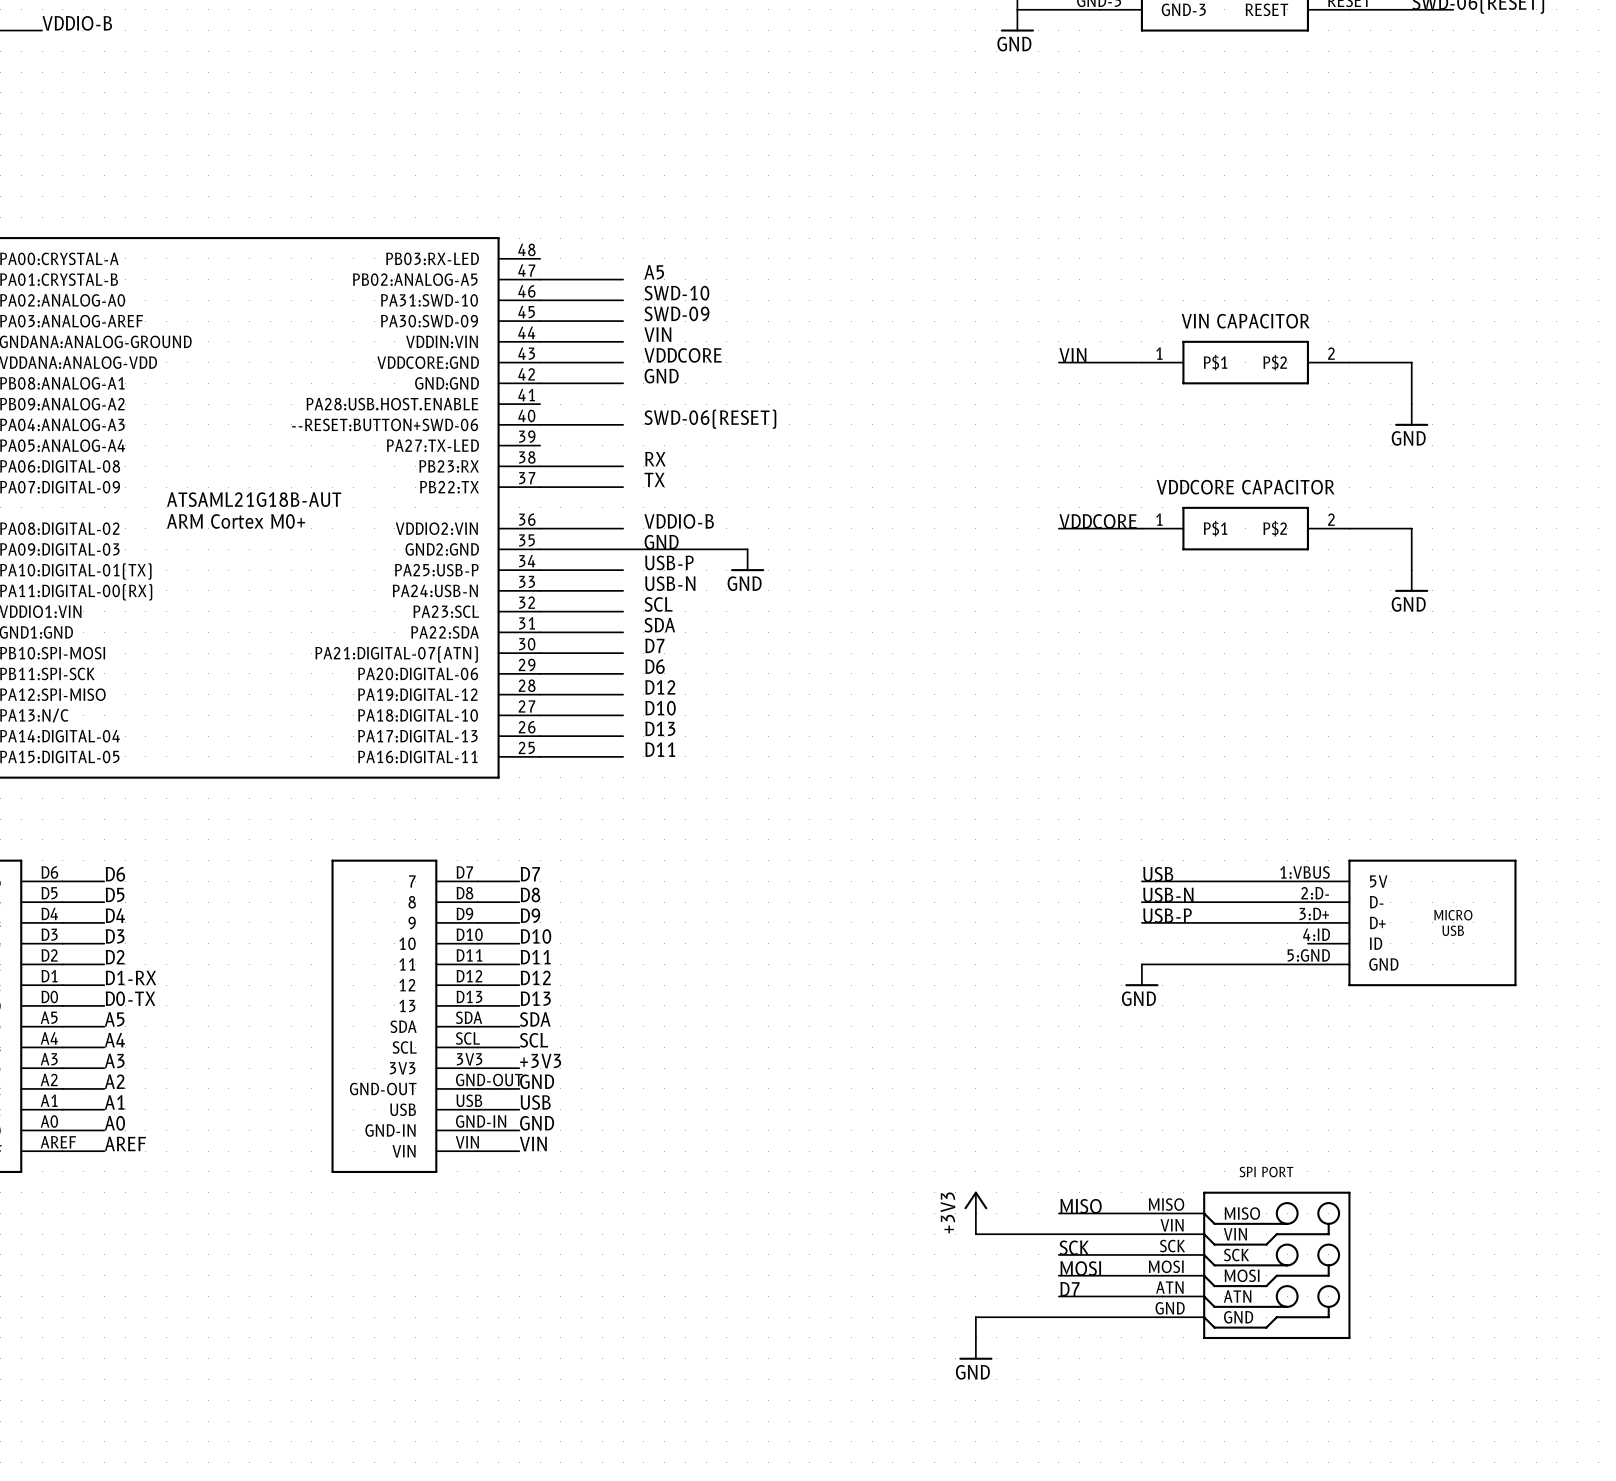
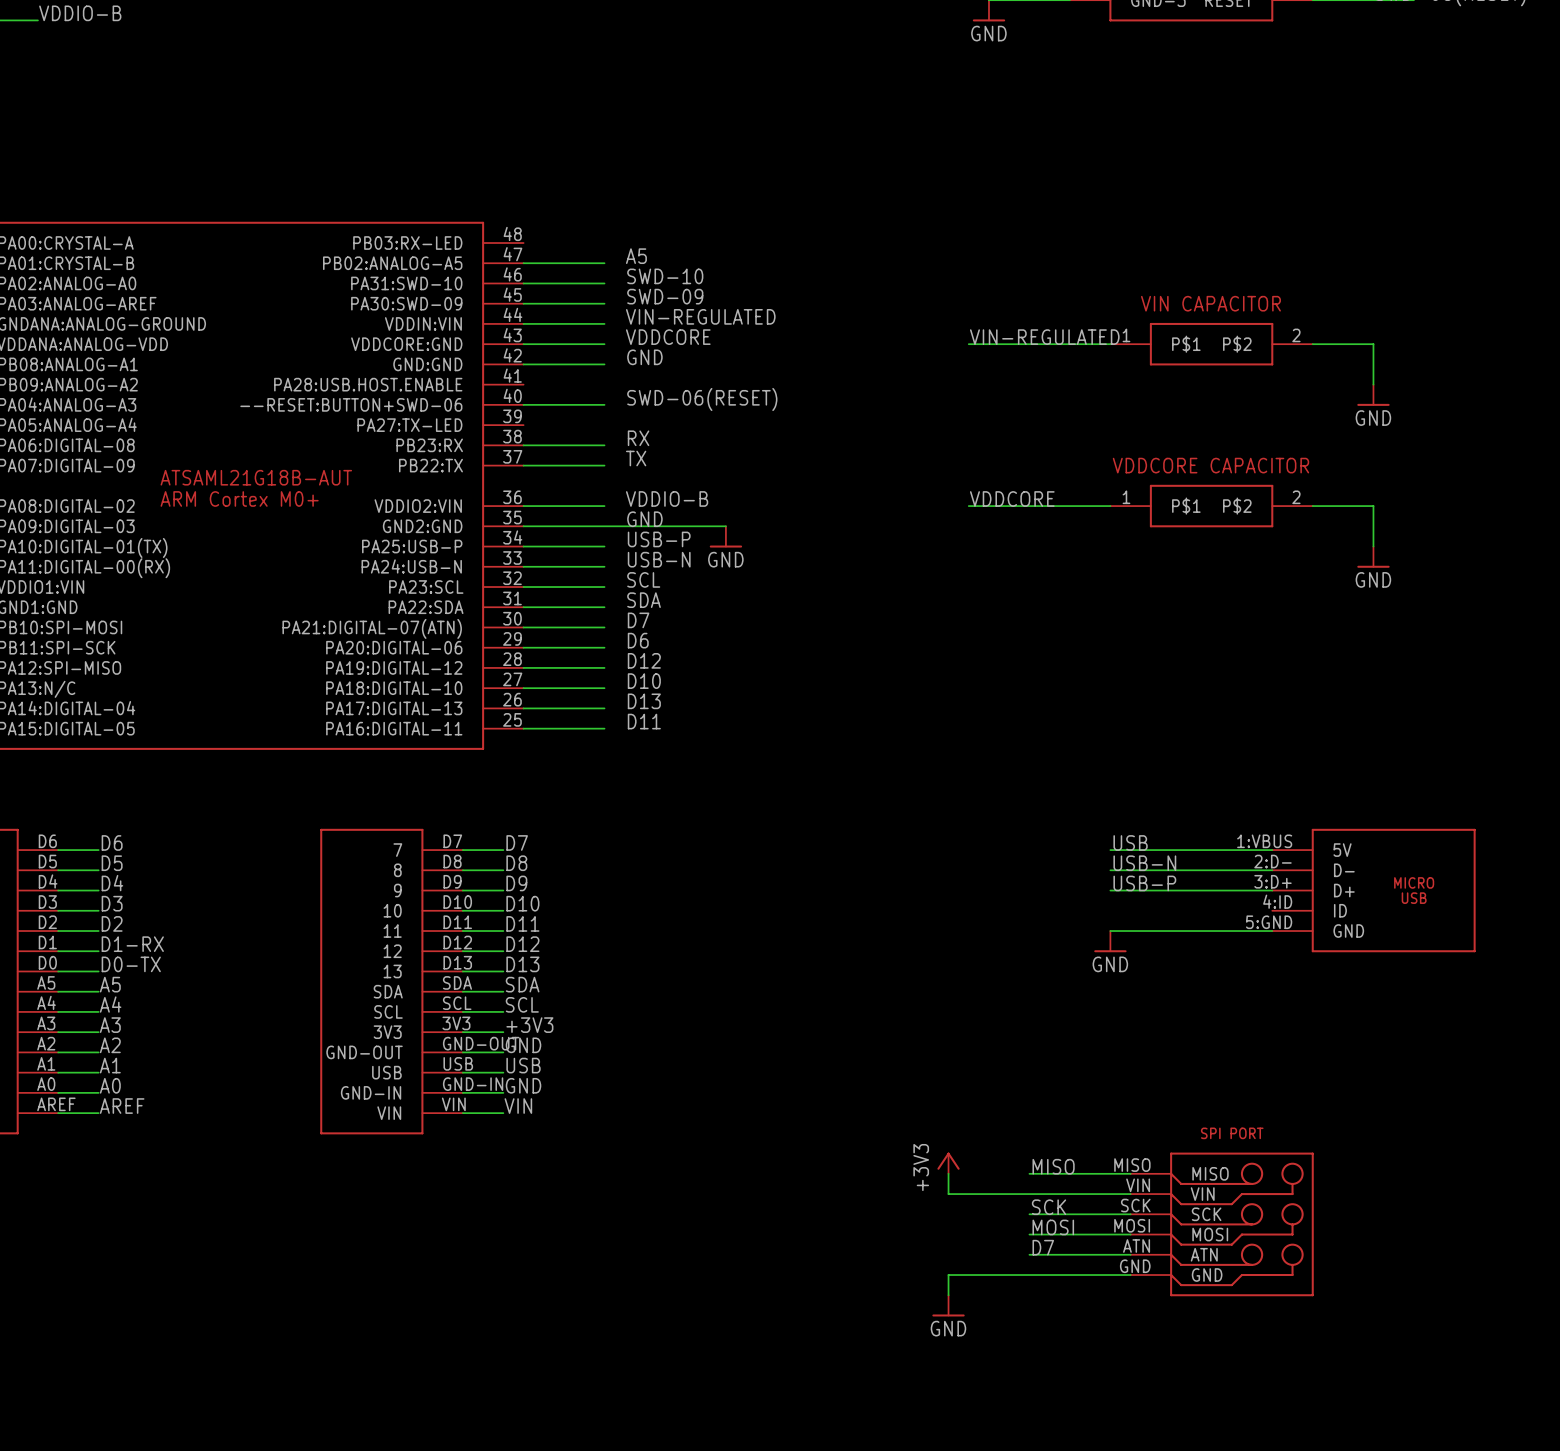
label: VIN (657, 334) -> VIN-REGULATED (700, 316)
label: none -> VIN-REGULATED (1044, 337)
label: VIN (1072, 355) -> none
wire: none -> (968, 344) (1029, 344)
label position: VDDCORE (1098, 521) -> VDDCORE (1012, 498)
wire: none -> (968, 506) (1029, 506)

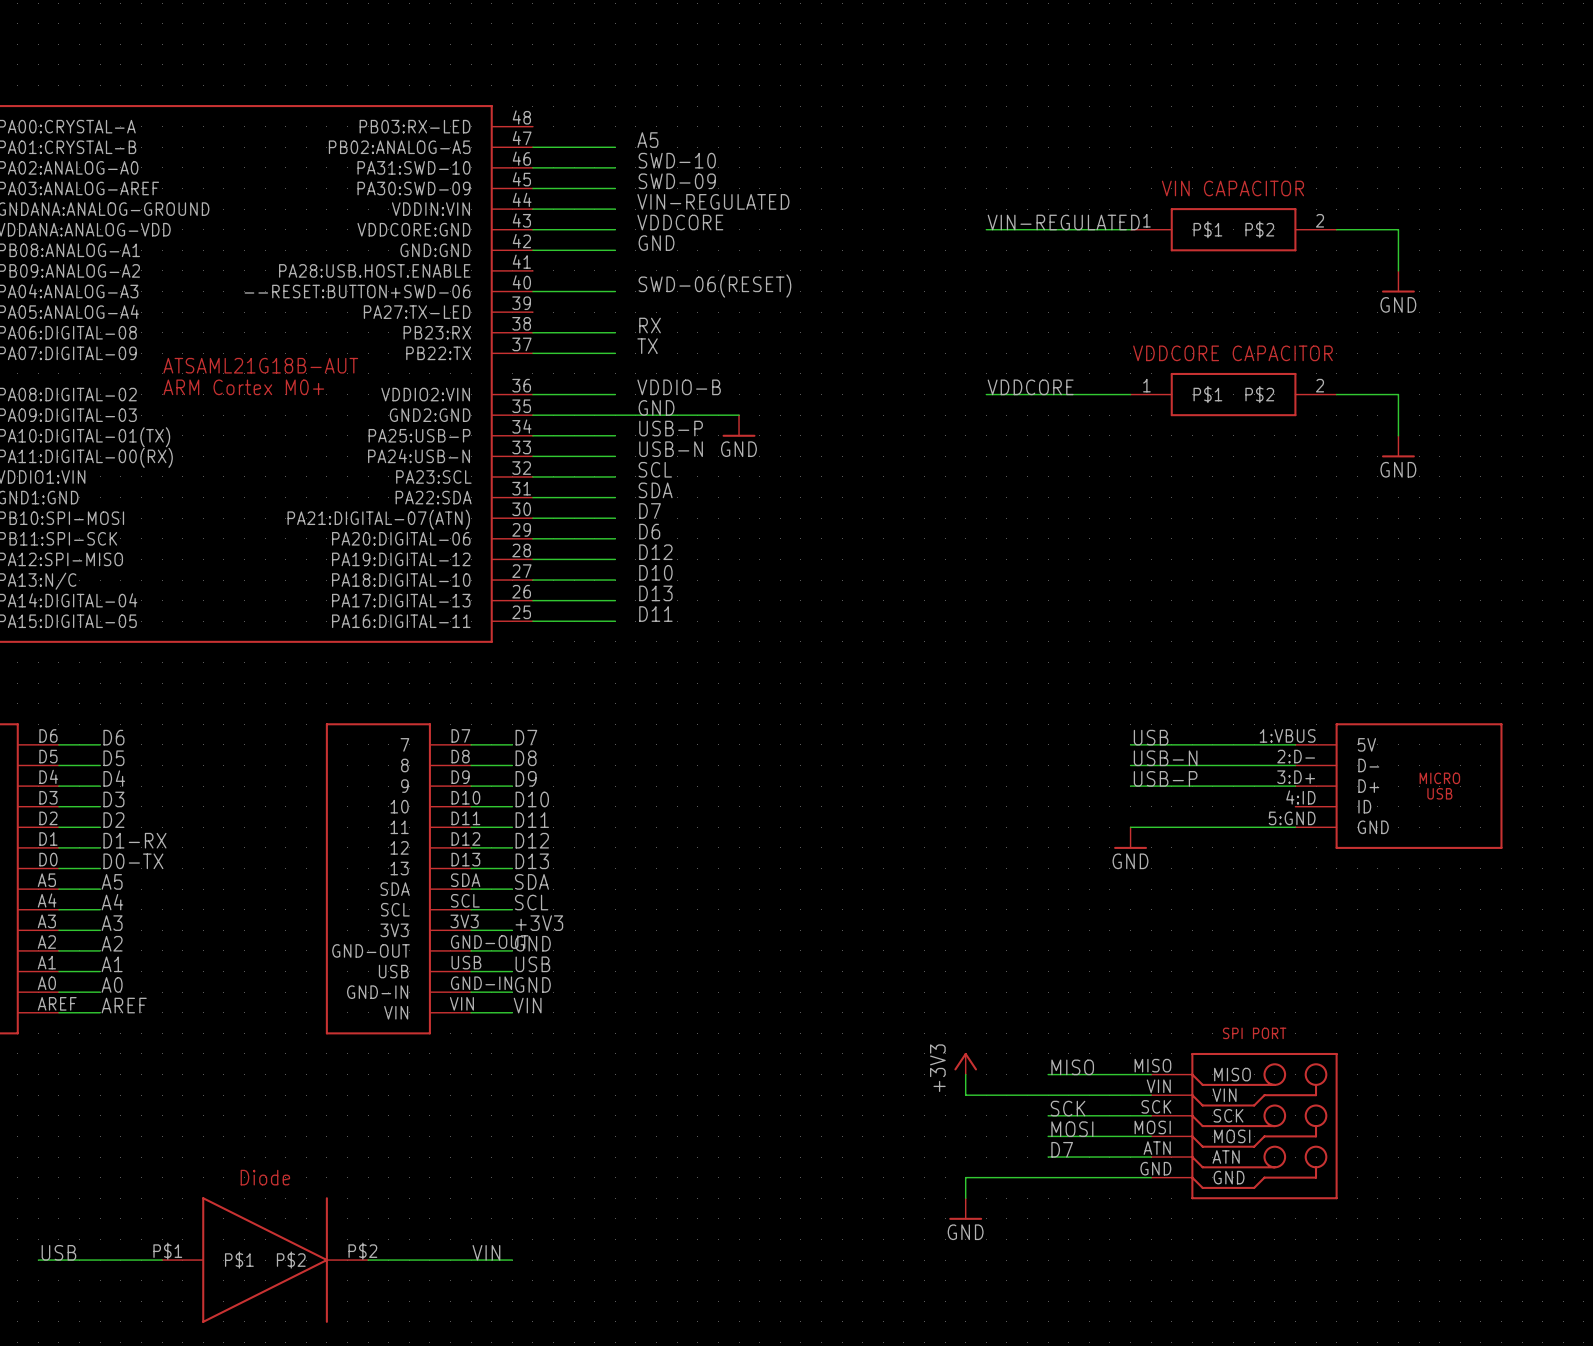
label: none -> USB (58, 1252)
label: none -> VIN (486, 1252)
wire: none -> (38, 1260) (162, 1260)
part: none -> (265, 1260)
wire: none -> (368, 1260) (512, 1260)

